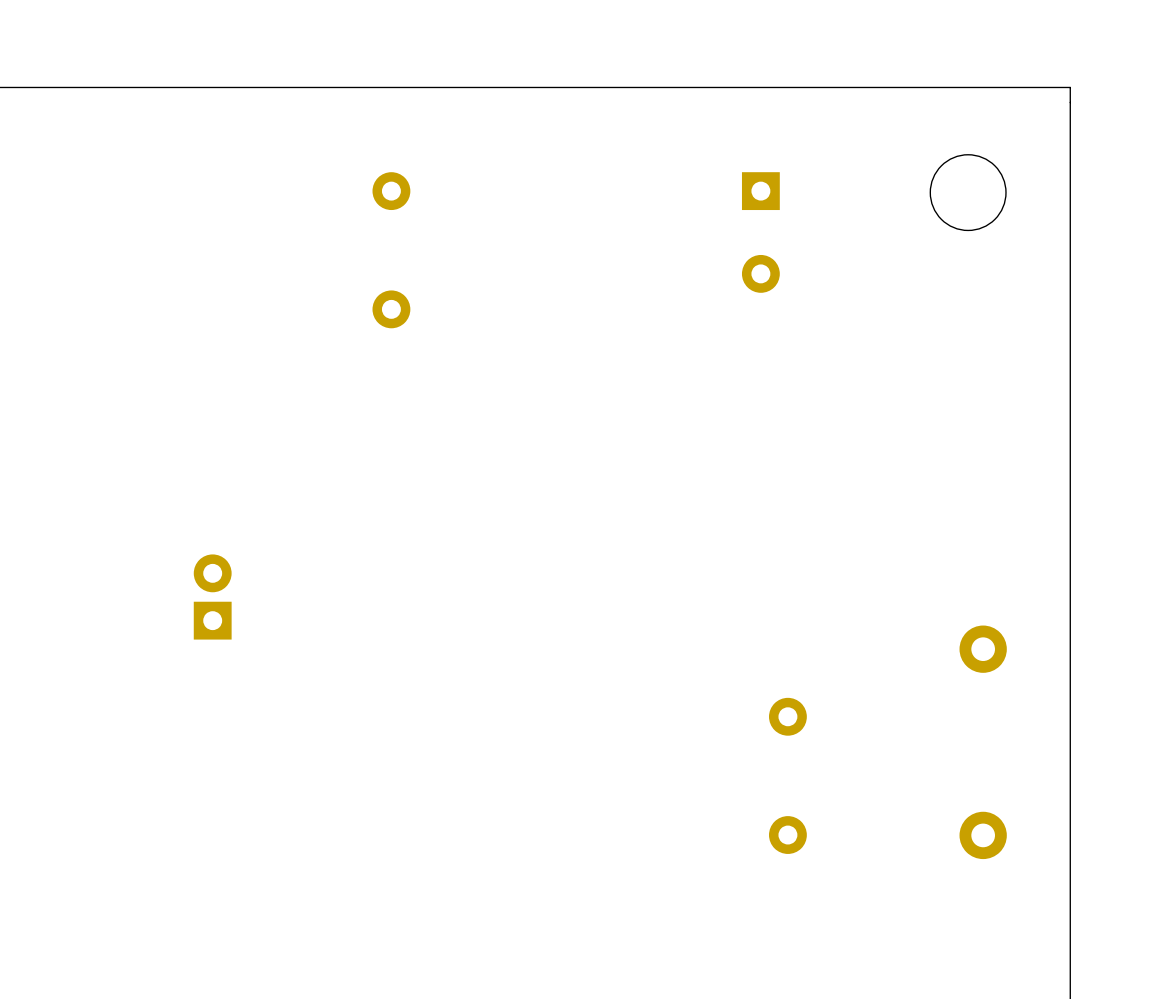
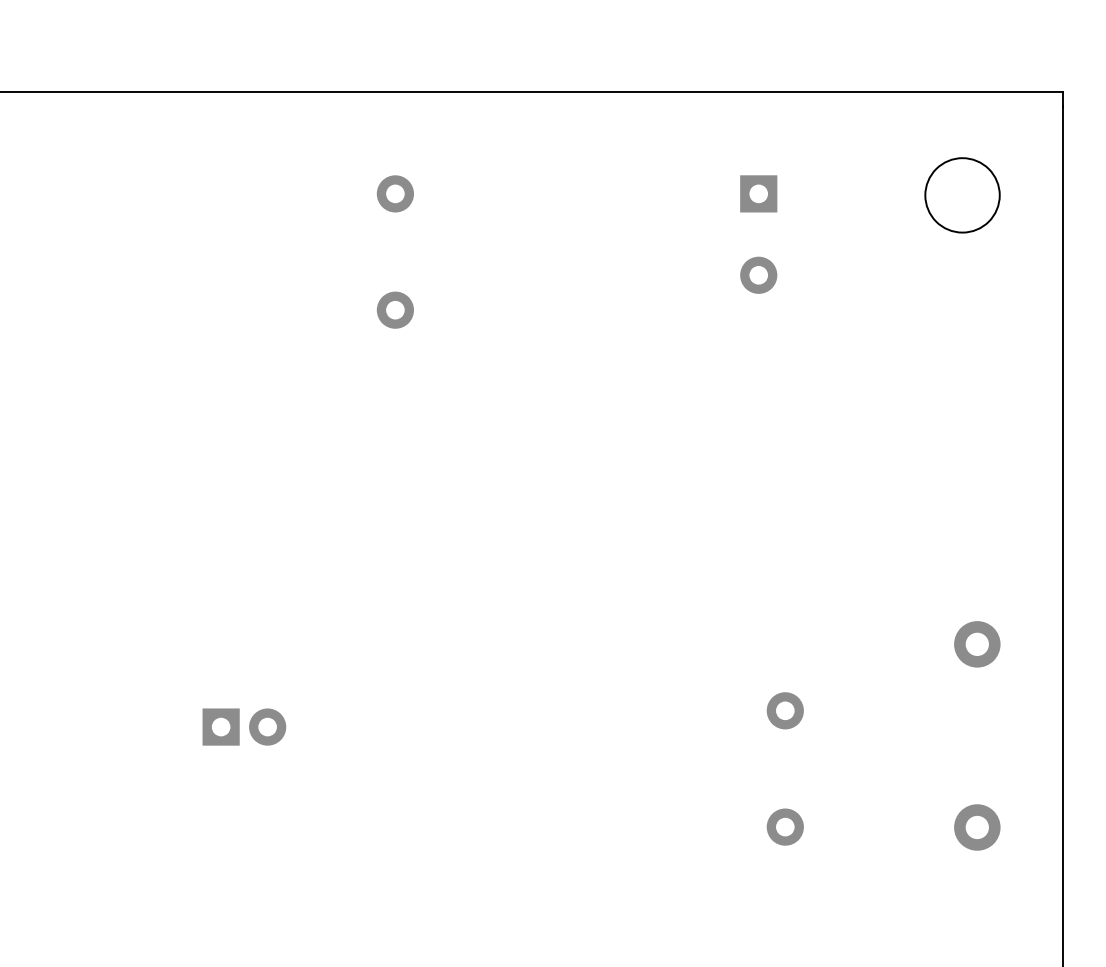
part rotation: 0° (212, 596) -> 90° clockwise (244, 727)
part position: (212, 596) -> (244, 727)

